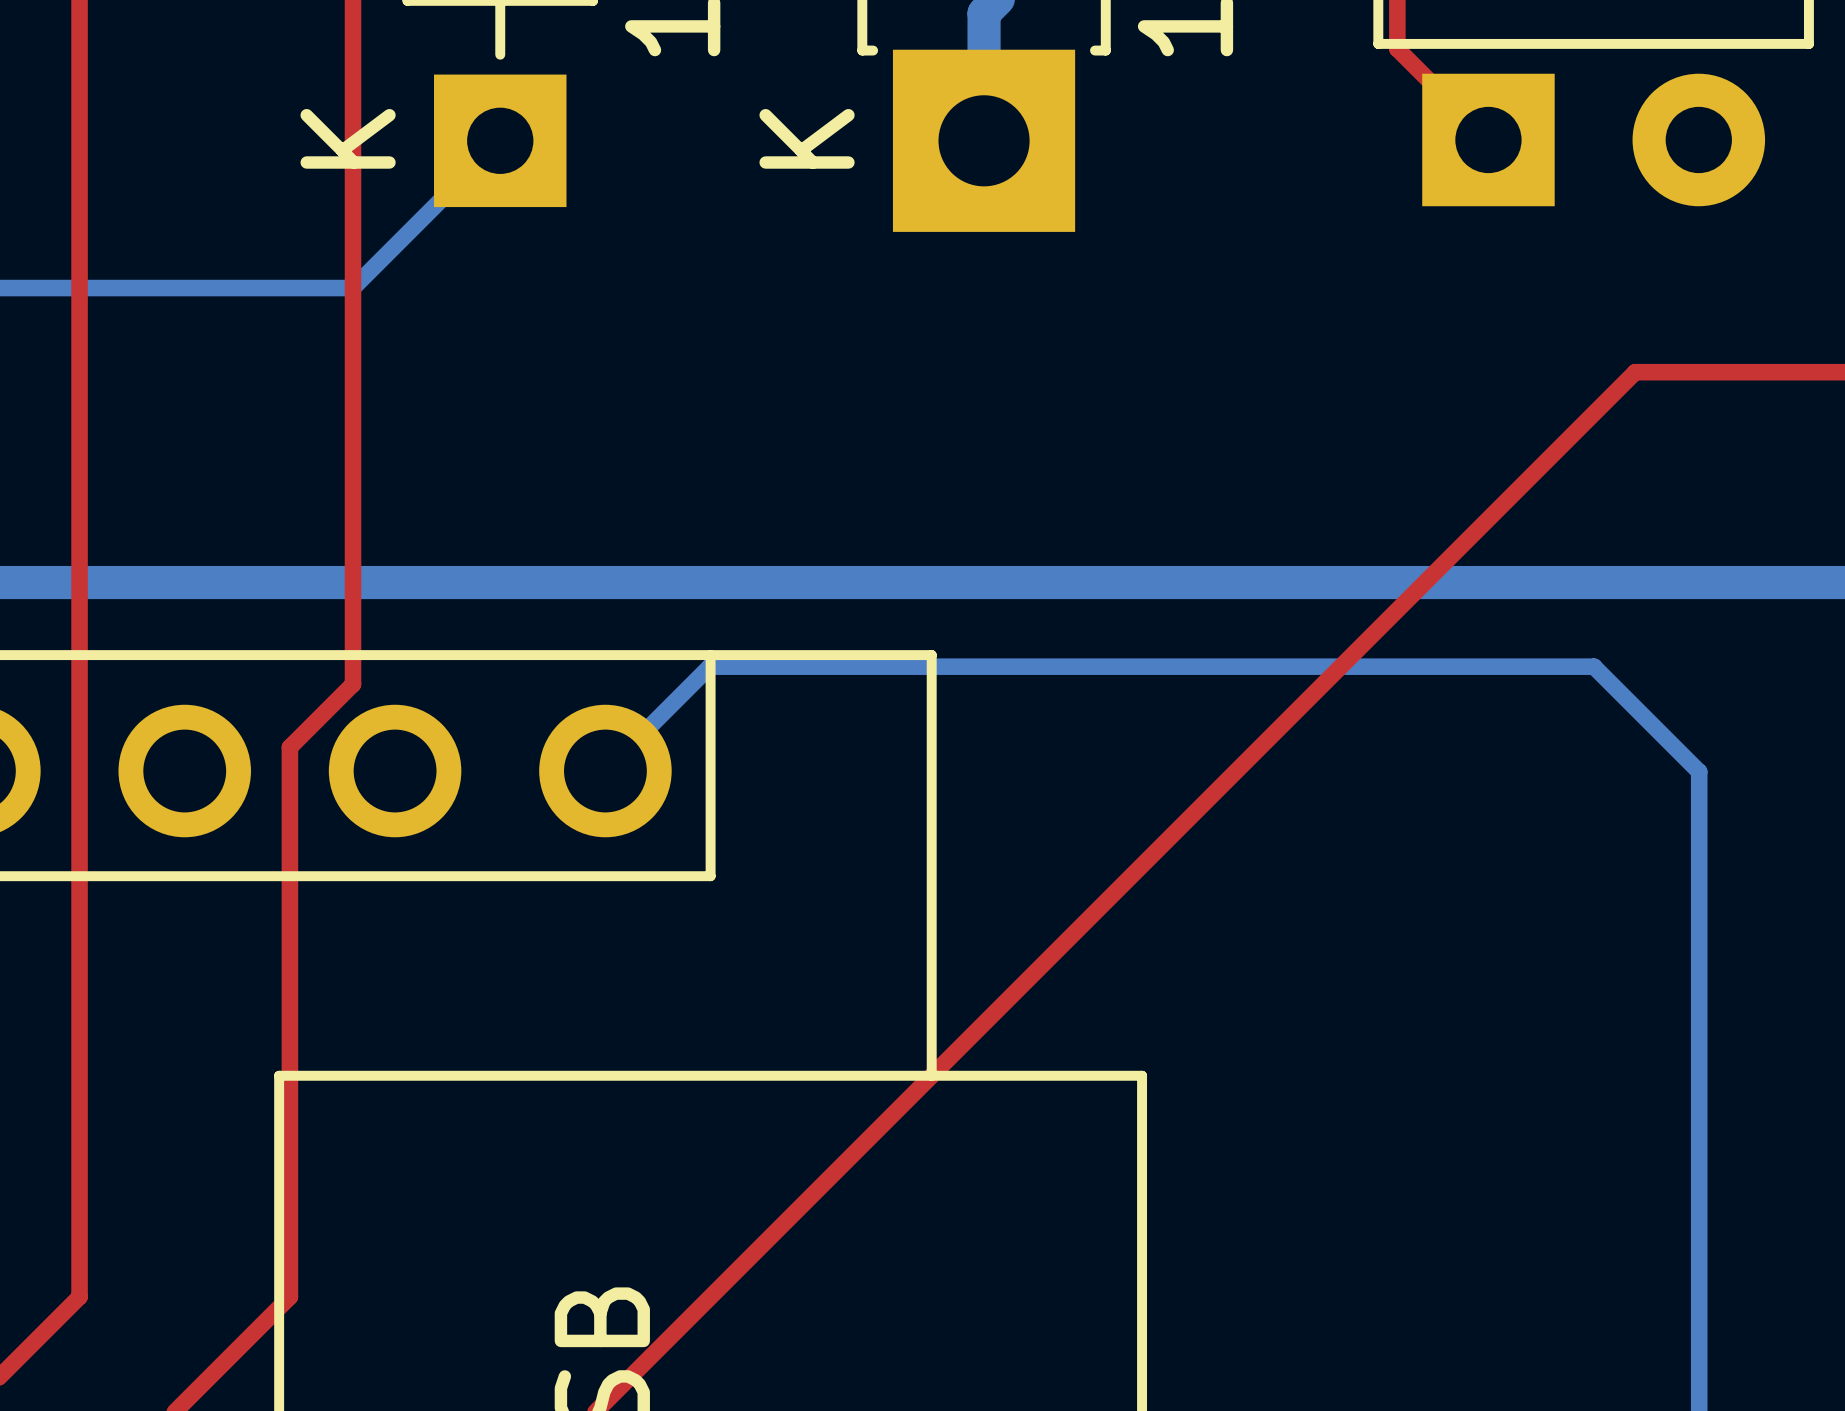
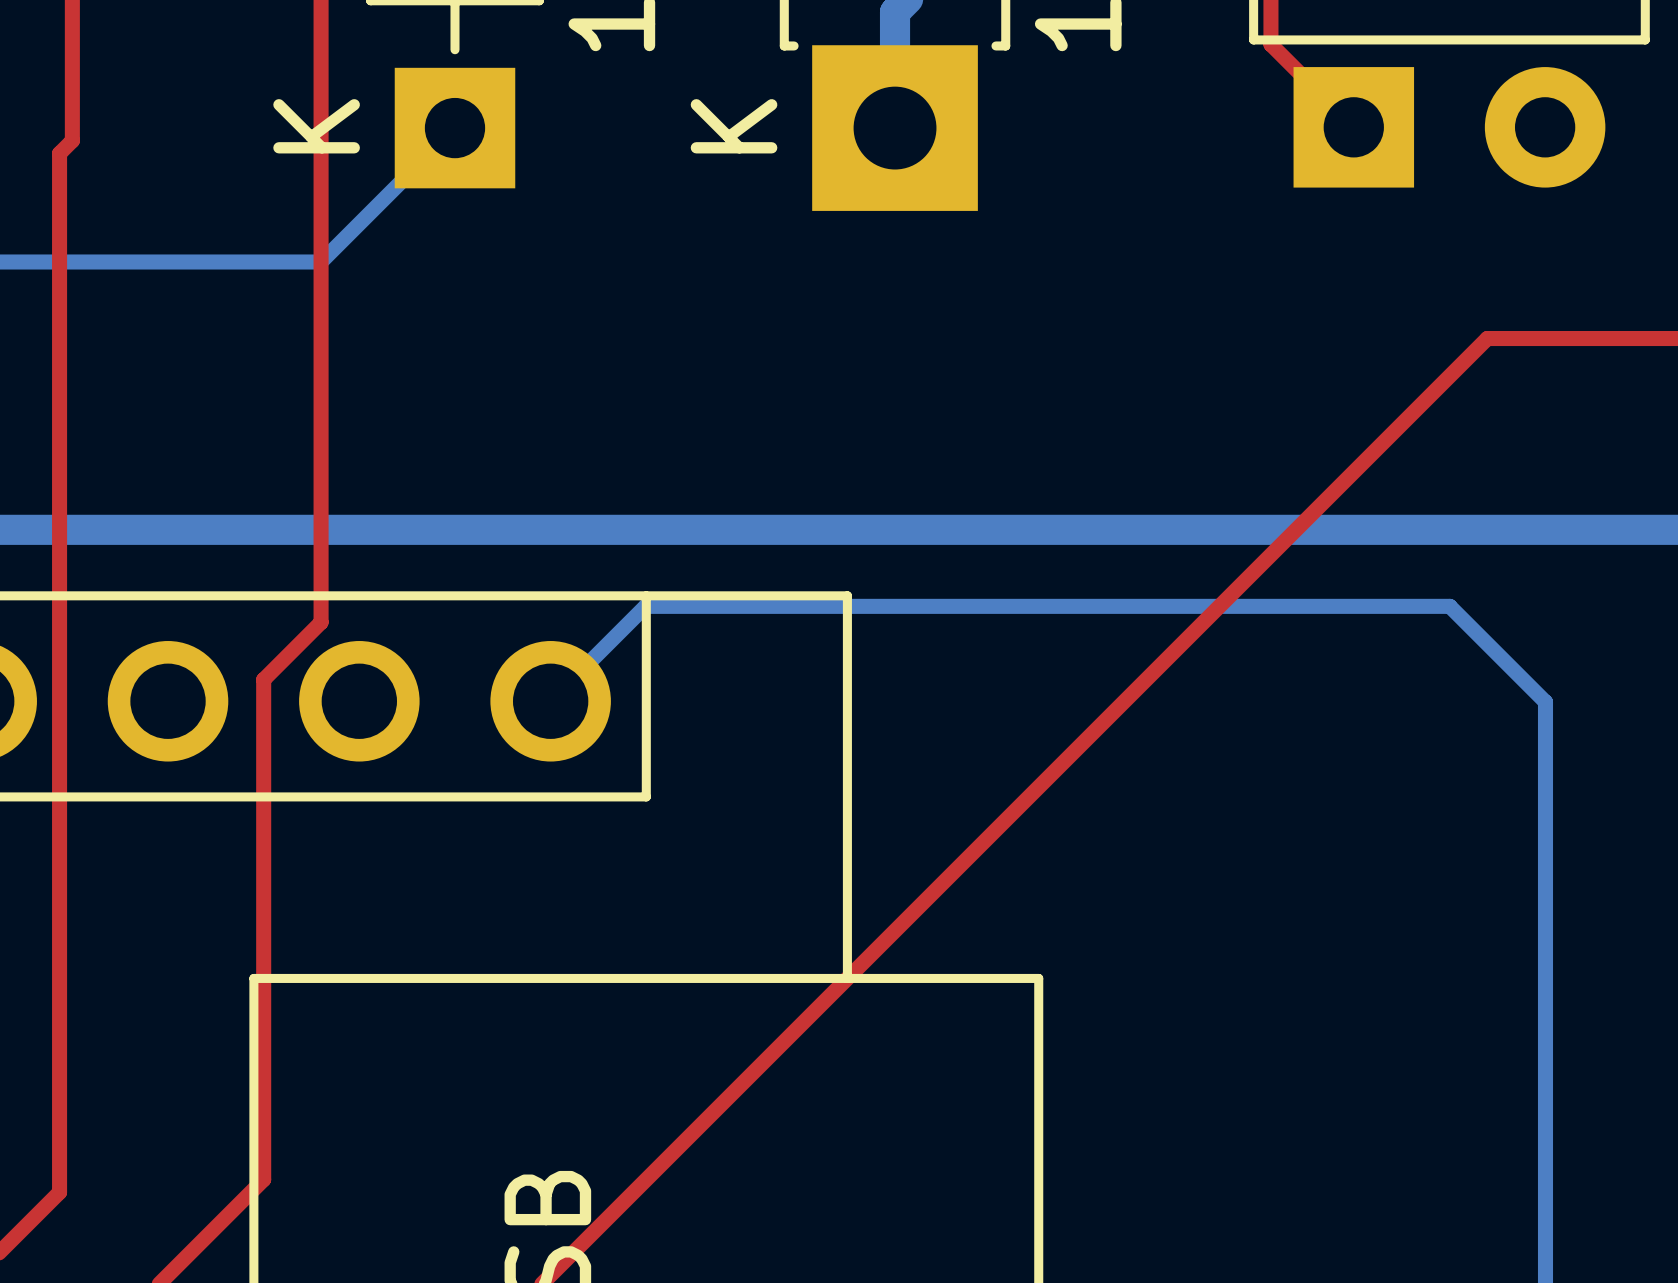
top track: (79, 154) (79, 1296) (65, 1310) -> (72, 140) (59, 153) (59, 1192)

